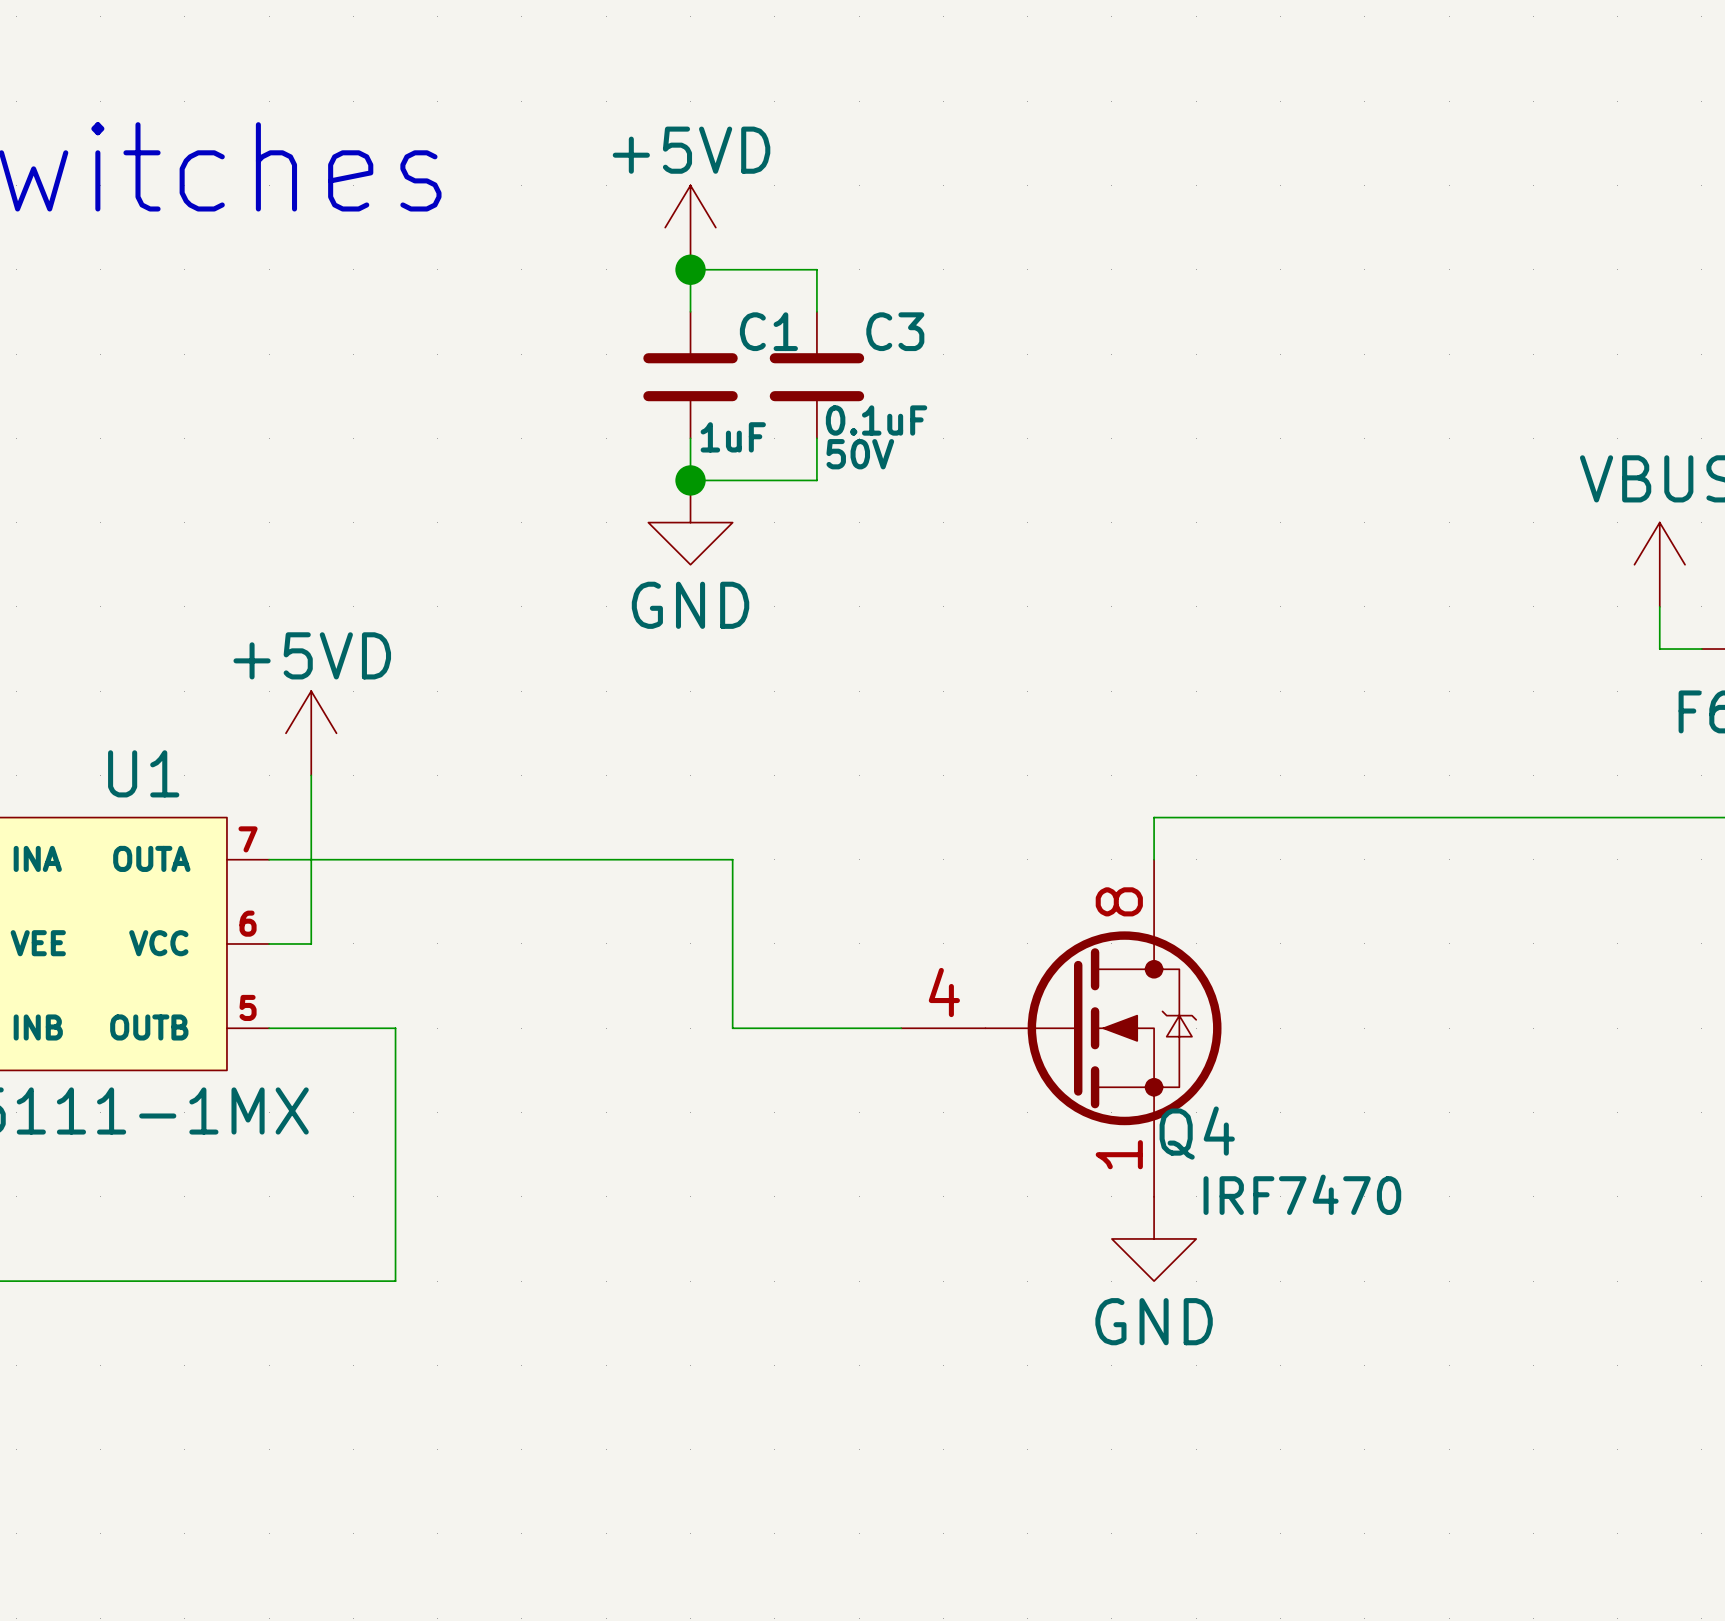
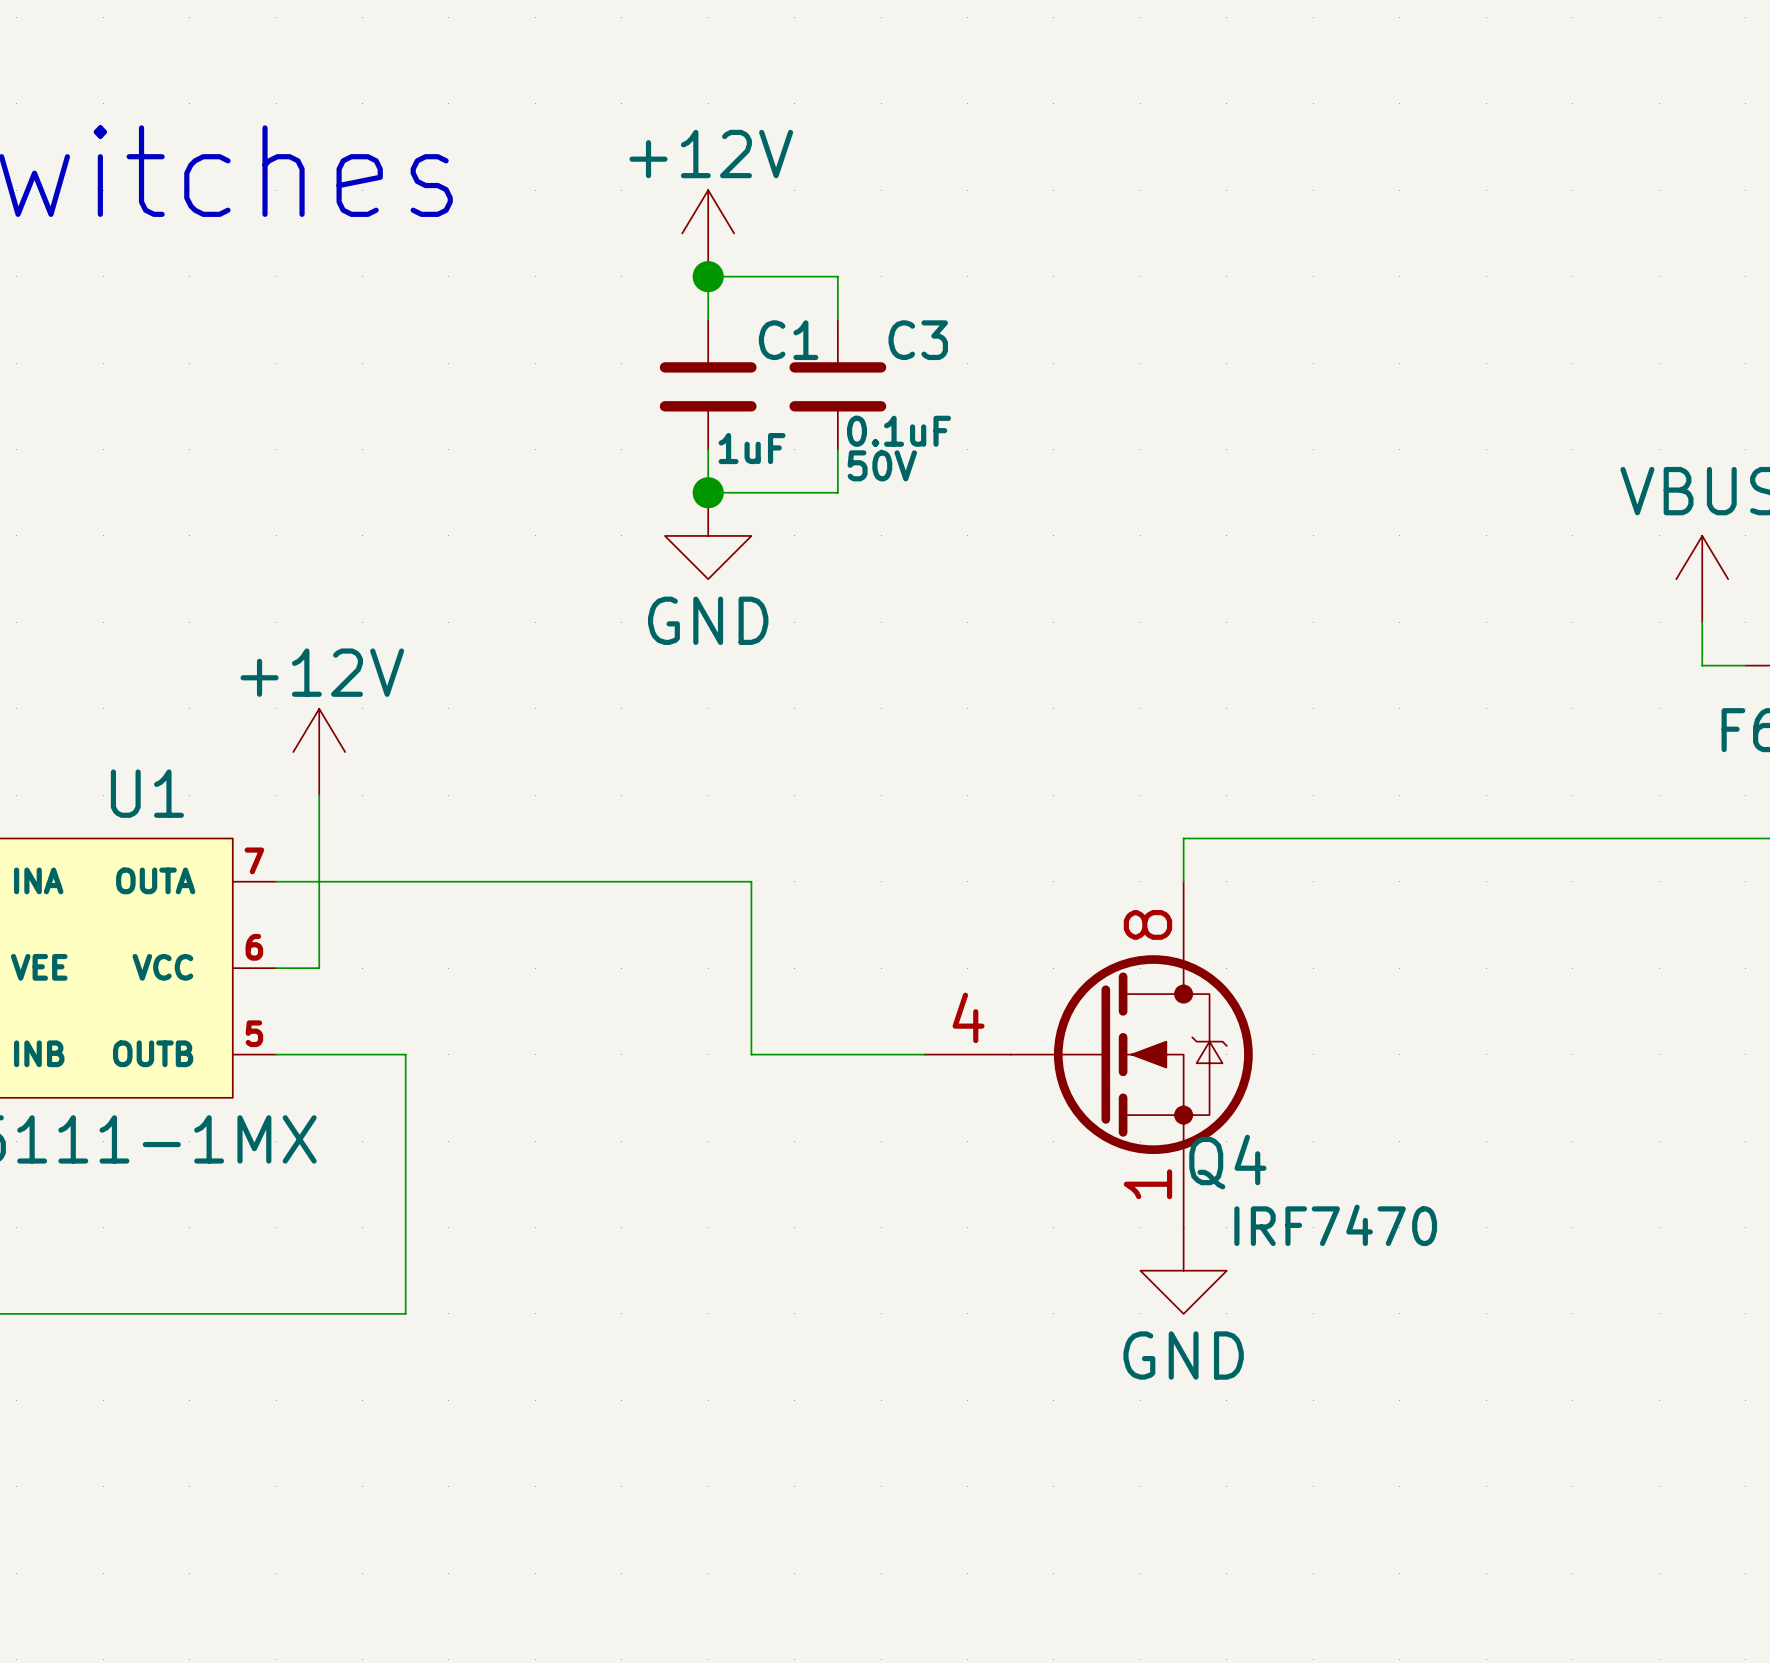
power symbol: +5VD (690, 227) -> +12V (708, 233)
power symbol: +5VD (311, 733) -> +12V (319, 752)

